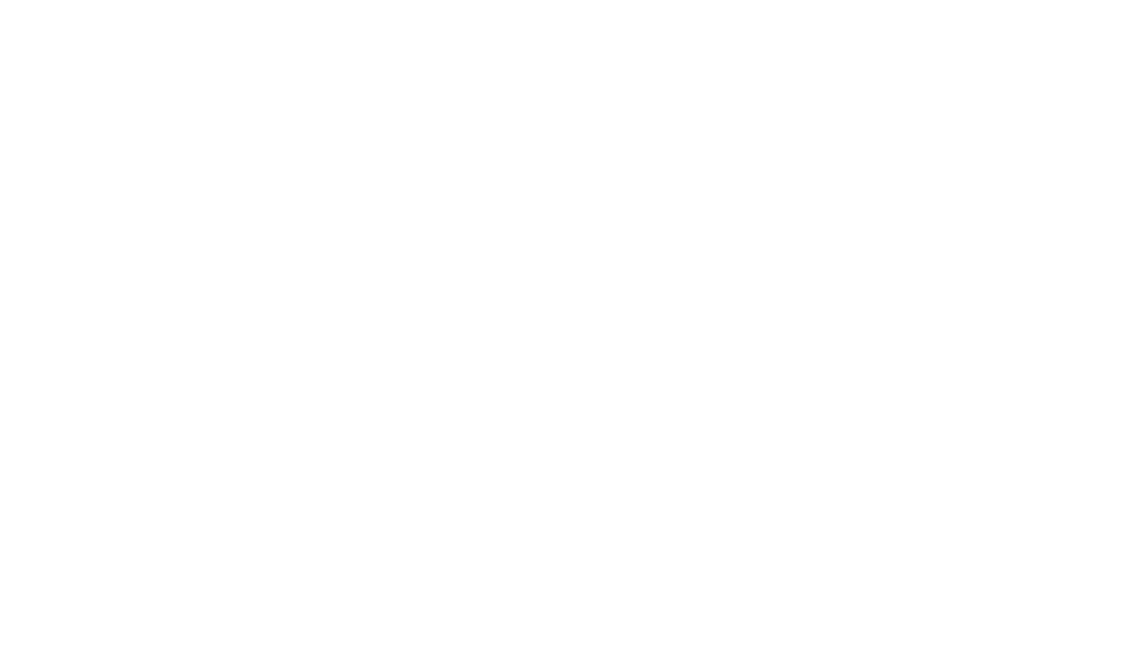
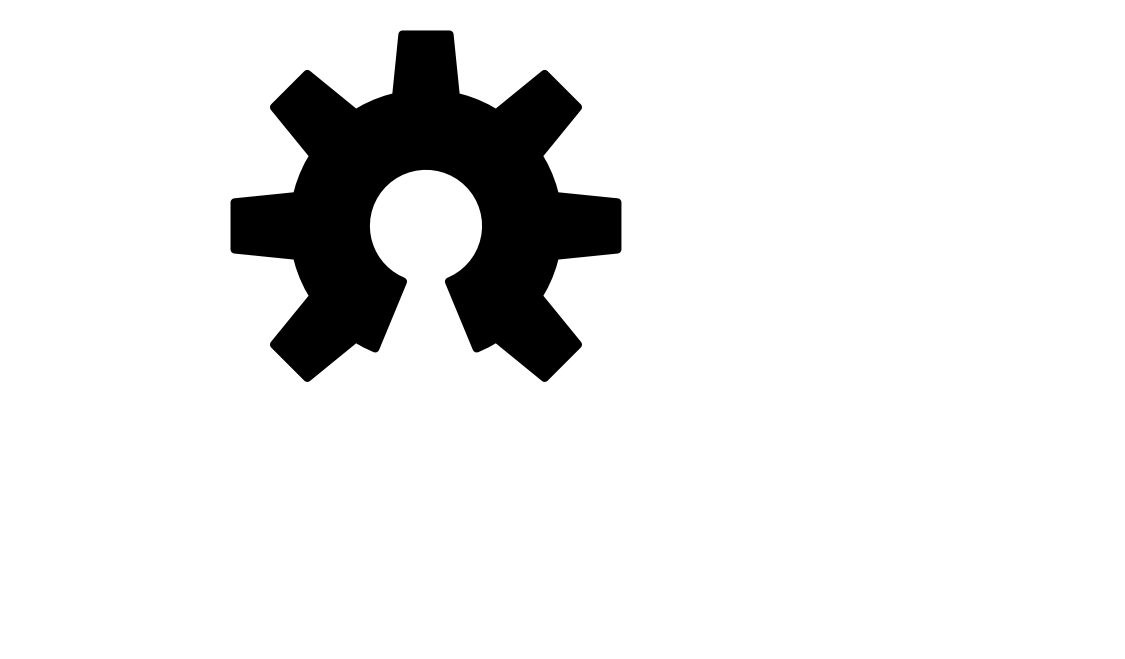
drawing: none -> [230, 30, 622, 382]

